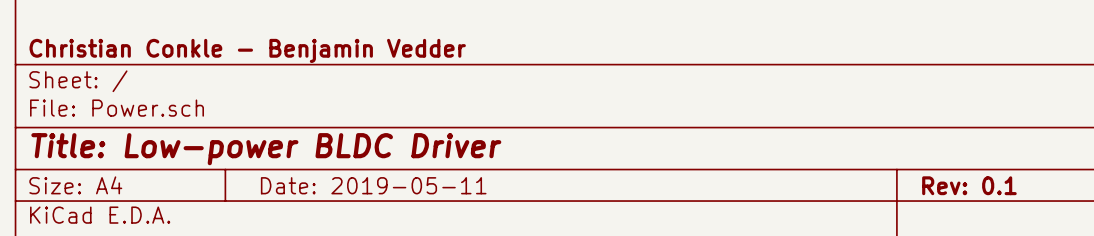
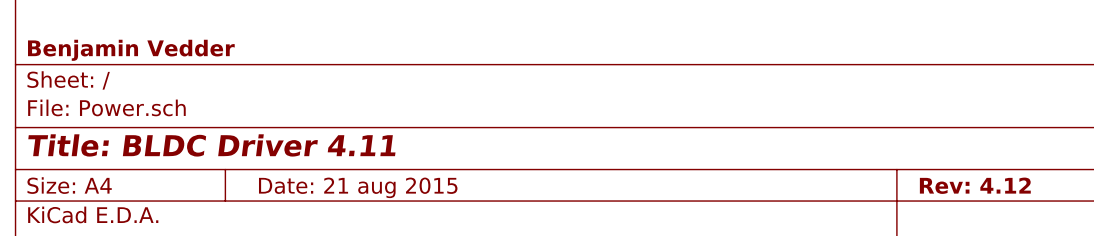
title block: Christian Conkle - Benjamin Vedder (247, 50) -> Benjamin Vedder (131, 50)
title block: Title: Low-power BLDC Driver (266, 149) -> Title: BLDC Driver 4.11 (211, 145)
title block: Date: 2019-05-11 (373, 185) -> Date: 21 aug 2015 (358, 187)
title block: Rev: 0.1 (969, 185) -> Rev: 4.12 (975, 185)

